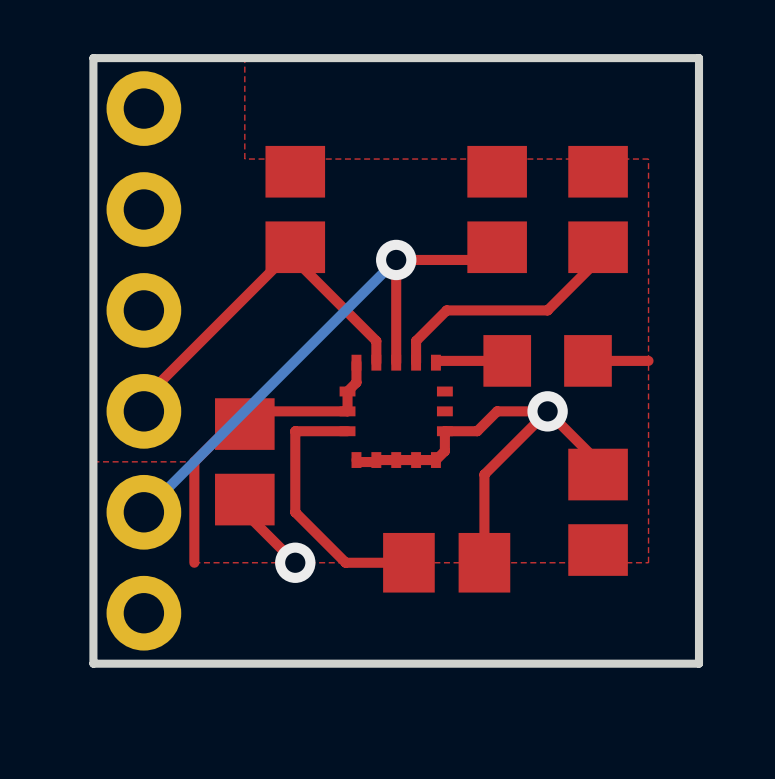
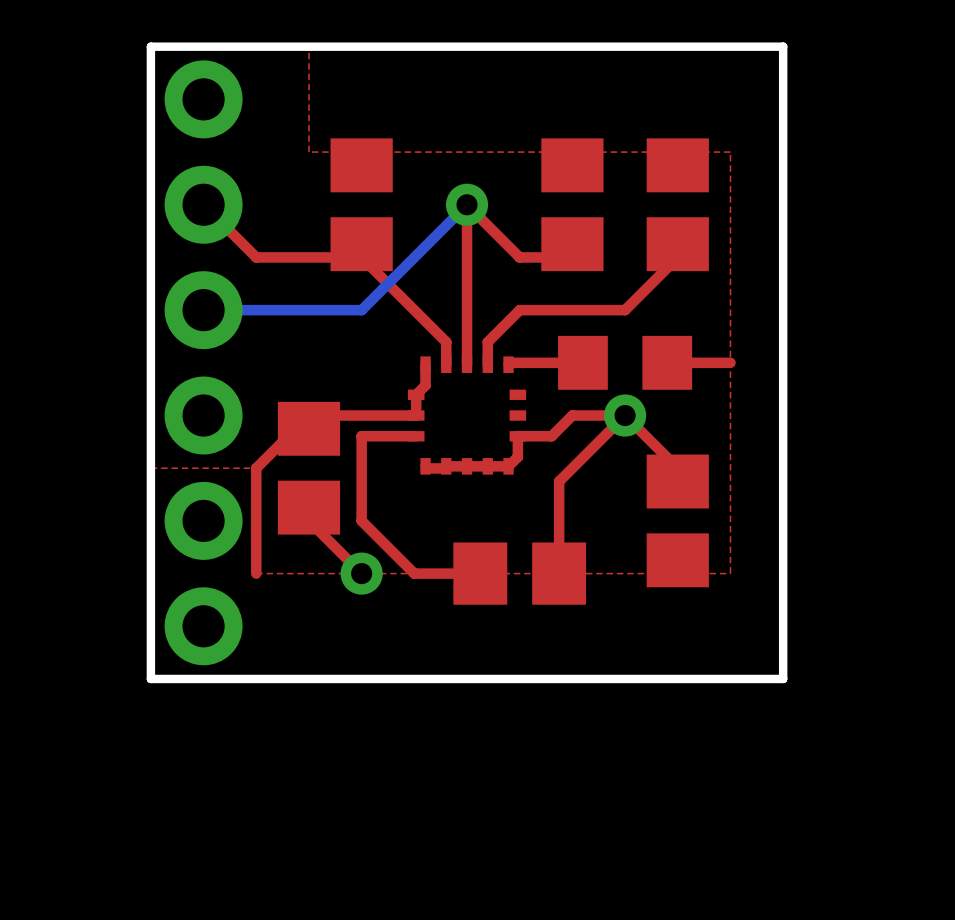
top track: none -> (203, 204) (256, 257) (361, 257)
bottom track: none -> (467, 204) (361, 310) (203, 310)
top track: (295, 247) (143, 398) (143, 411) -> none
bottom track: (396, 259) (143, 512) -> none
via position: (396, 259) -> (467, 204)
top track: (446, 259) (396, 259) -> (519, 257) (467, 204) (467, 257)

